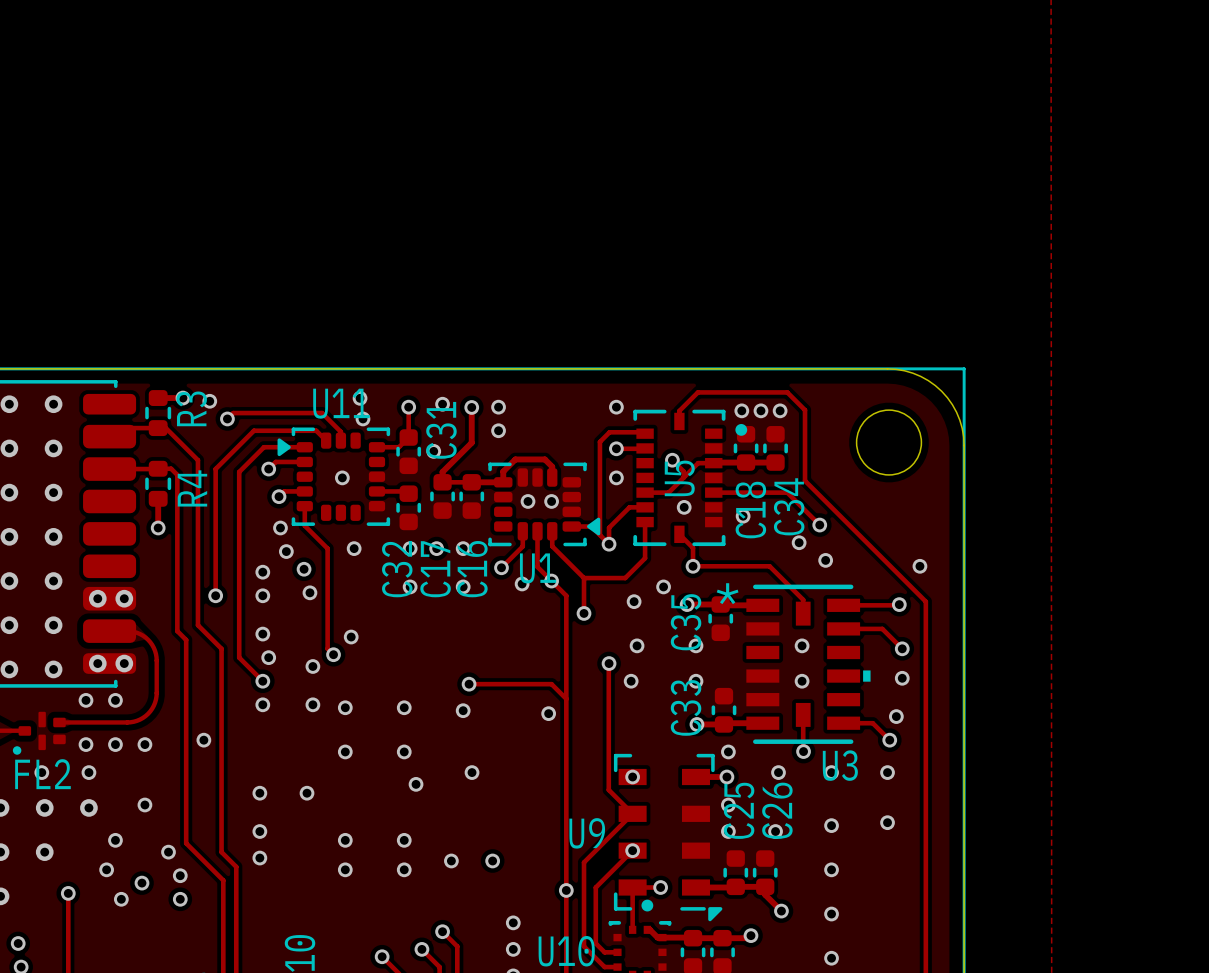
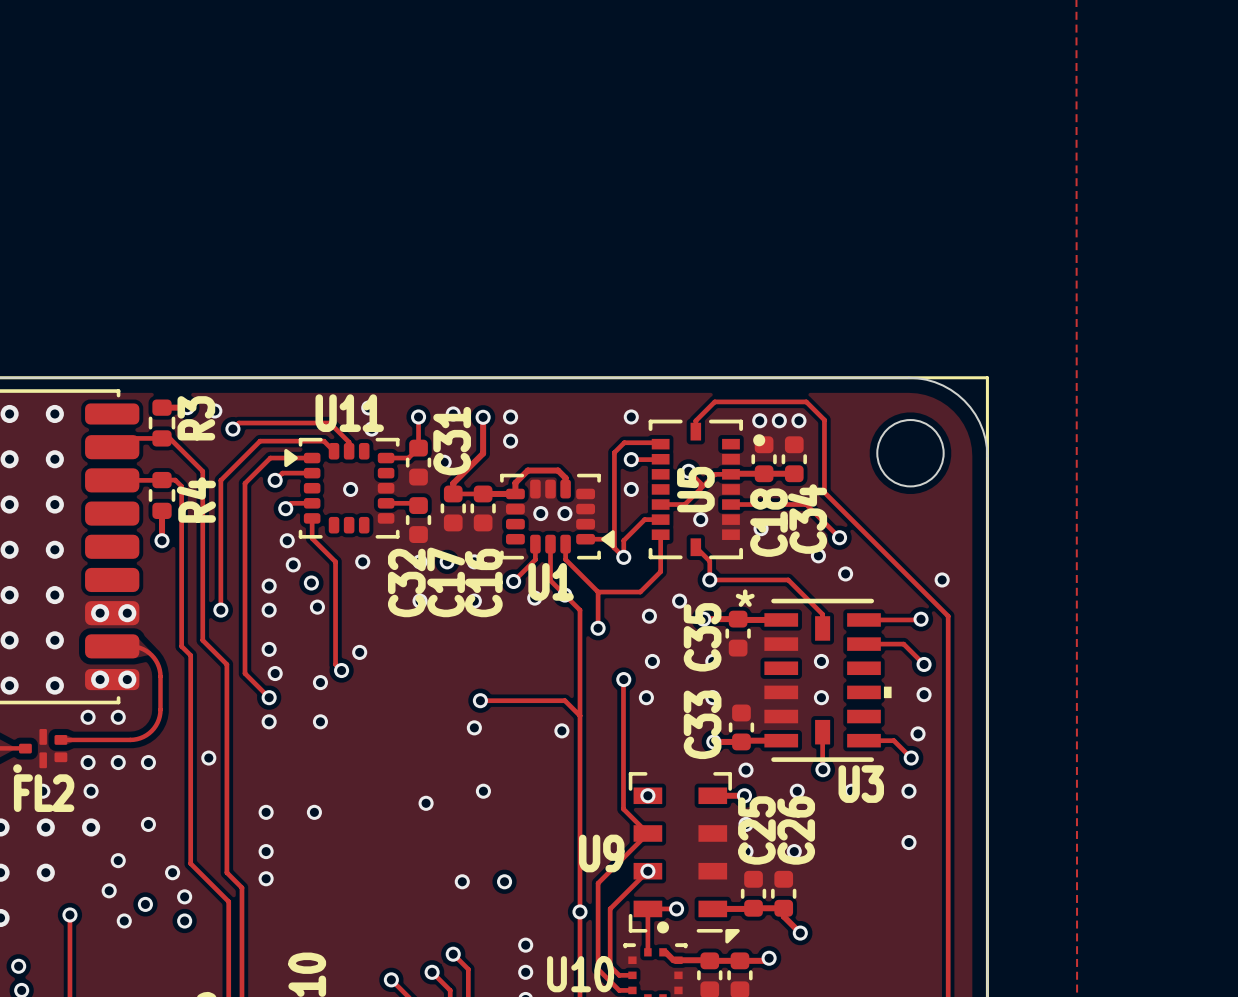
via: (345, 707) -> none
via: (404, 707) -> none
via: (345, 751) -> none
via: (404, 751) -> none
via: (831, 825) -> none
via: (345, 840) -> none
via: (404, 840) -> none
via: (345, 869) -> none
via: (404, 869) -> none
via: (831, 869) -> none
via: (831, 914) -> none
via: (831, 958) -> none

